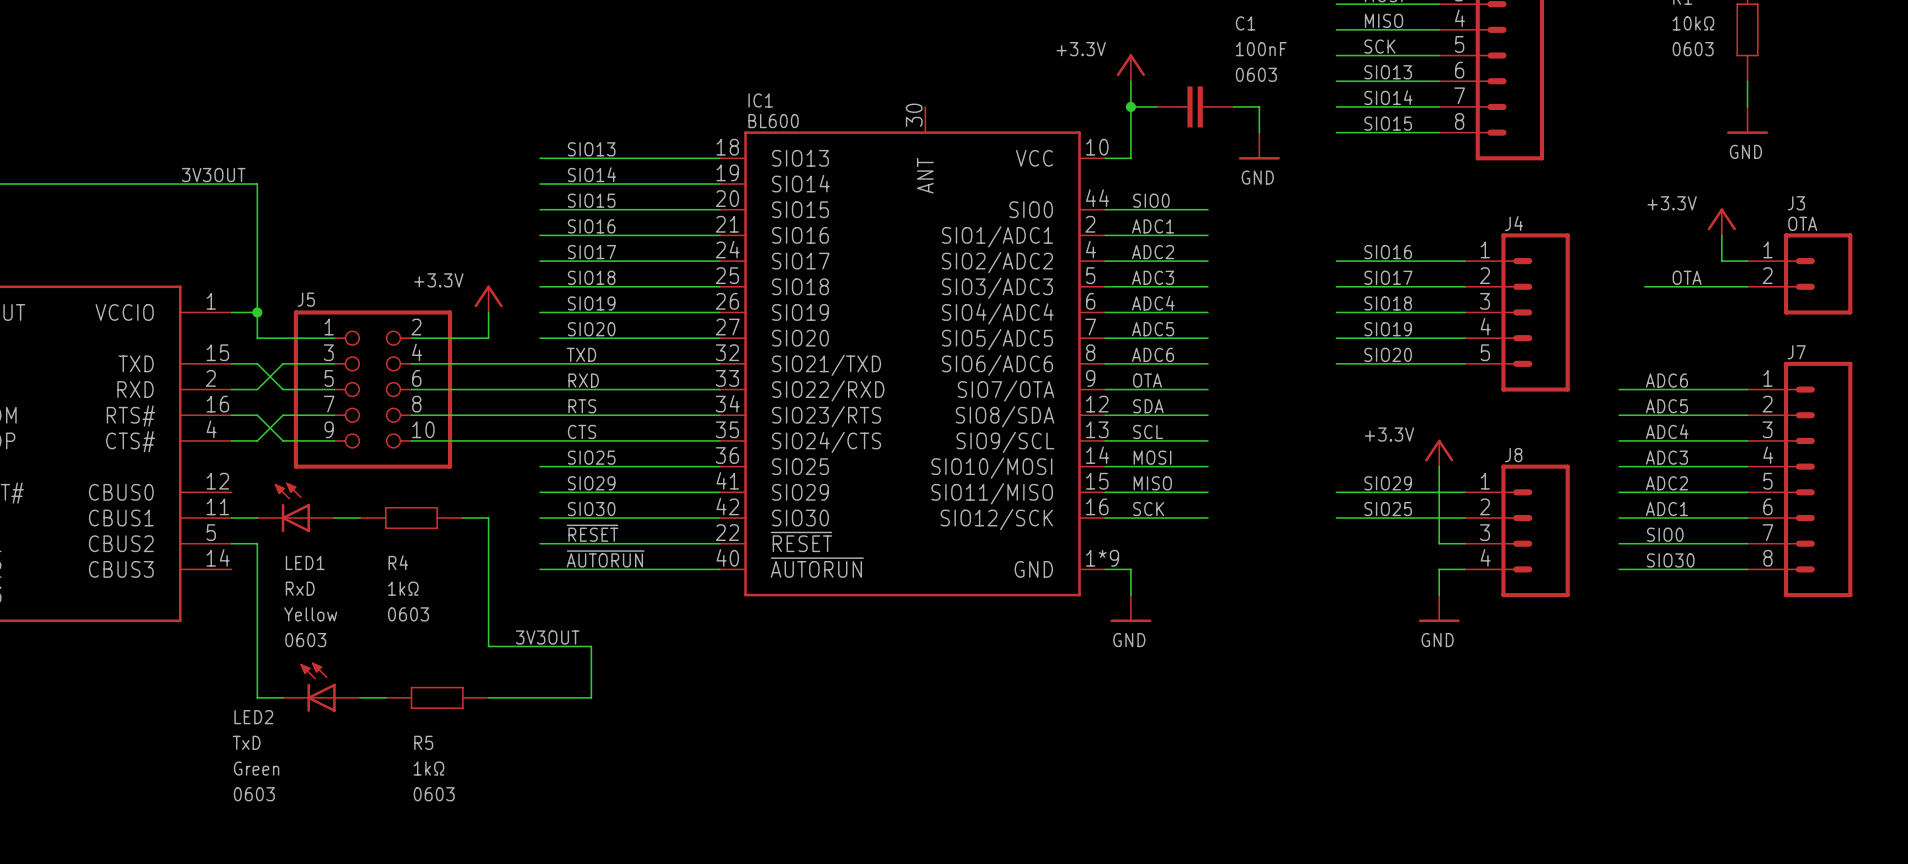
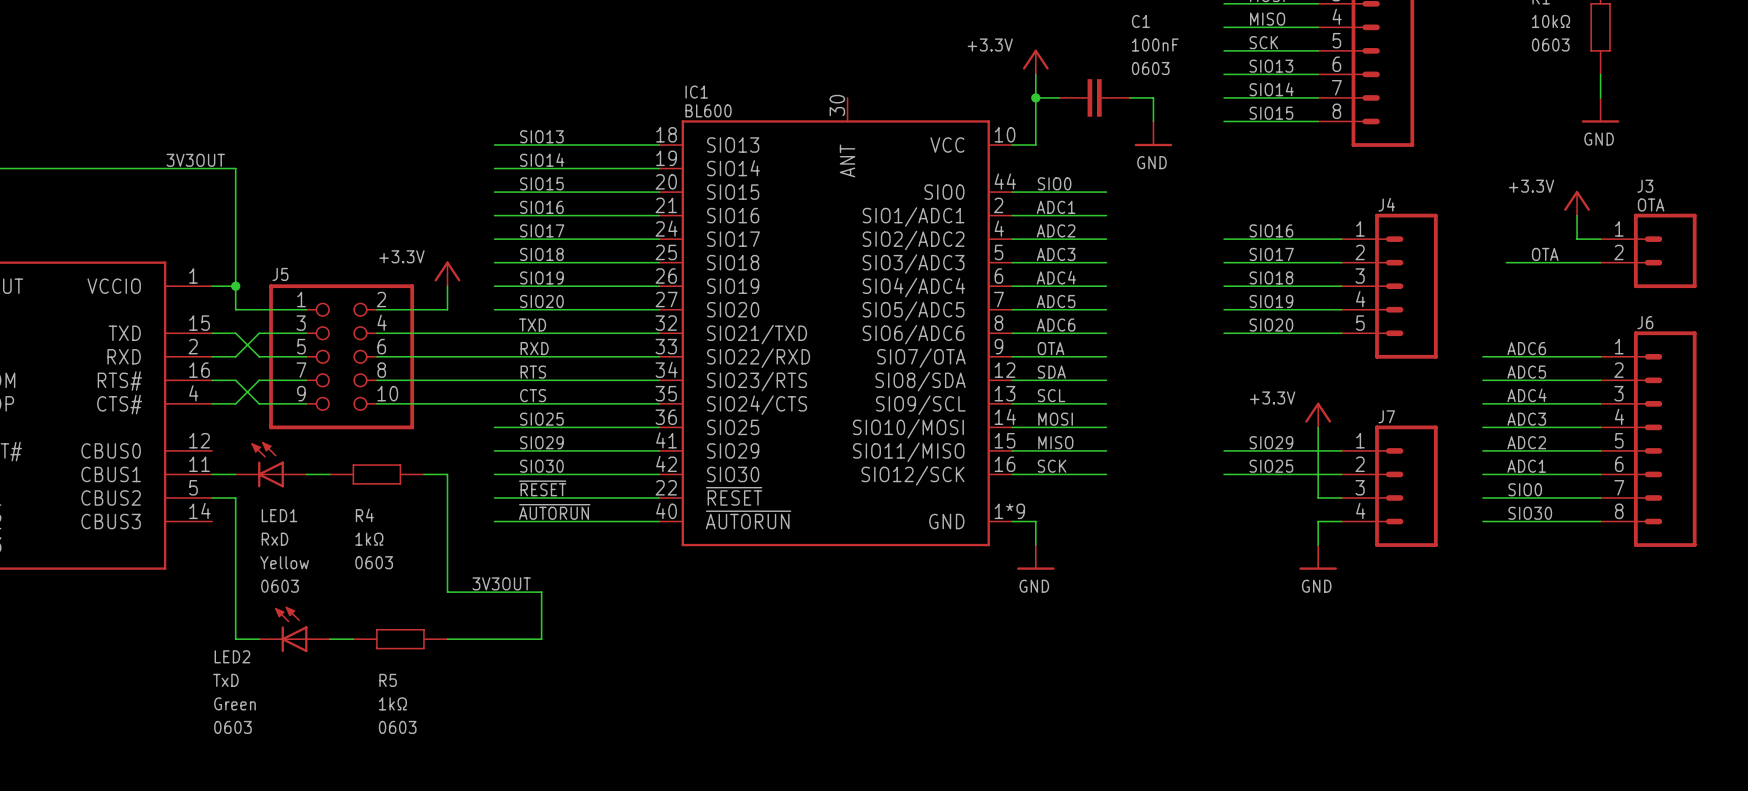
J7 name: J7 (1796, 352) -> J6 (1645, 322)
J8 name: J8 (1513, 455) -> J7 (1386, 416)

